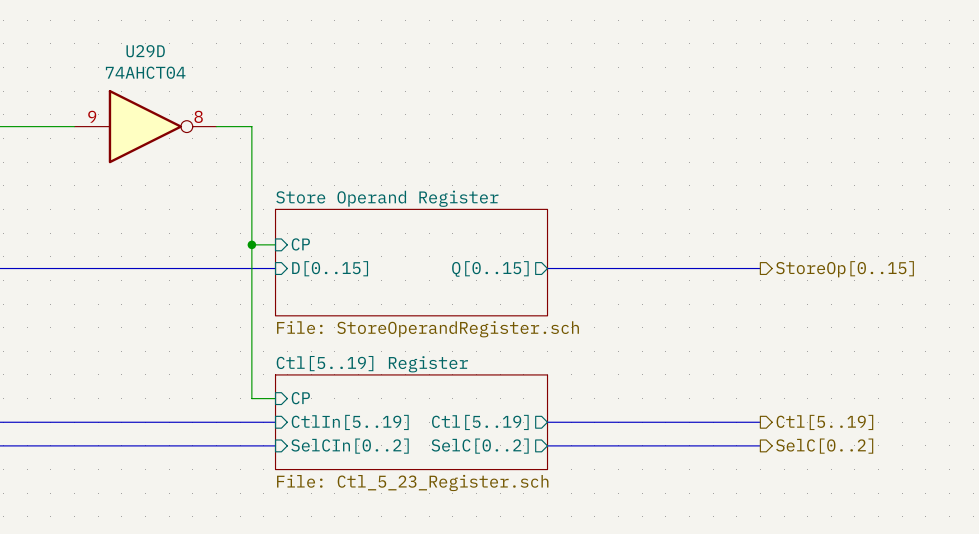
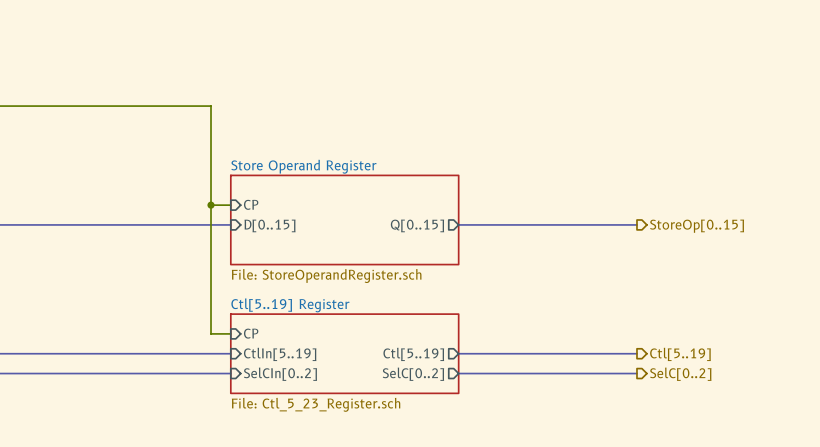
U29D: 74AHCT04 (145, 126) -> none

